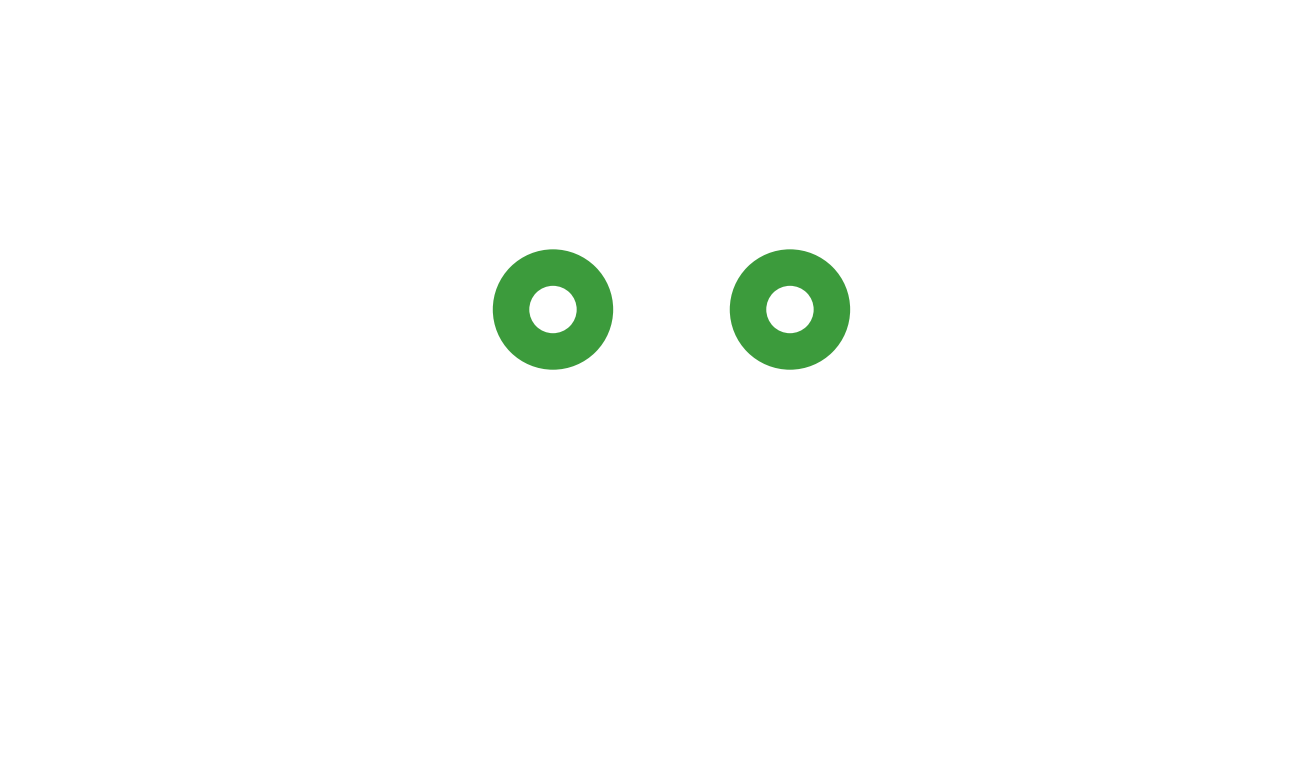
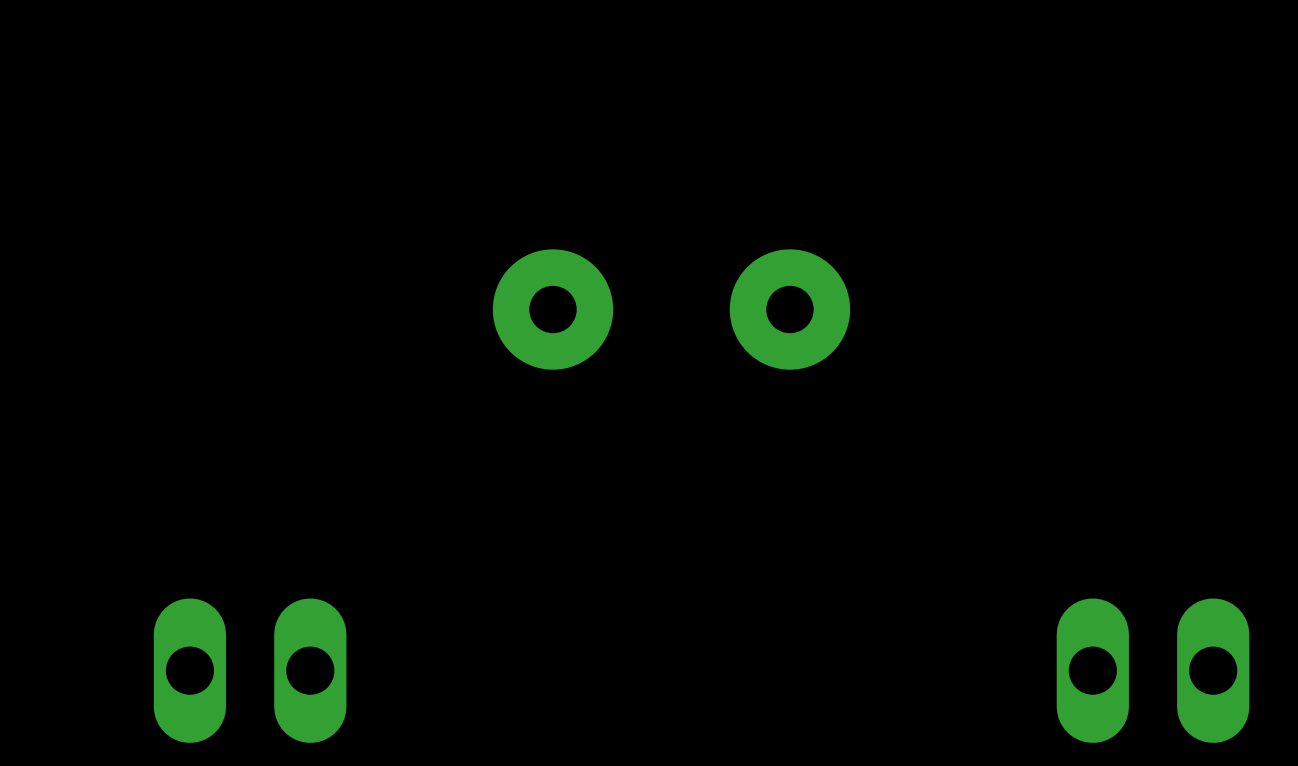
part: none -> (250, 670)
part: none -> (1153, 670)

